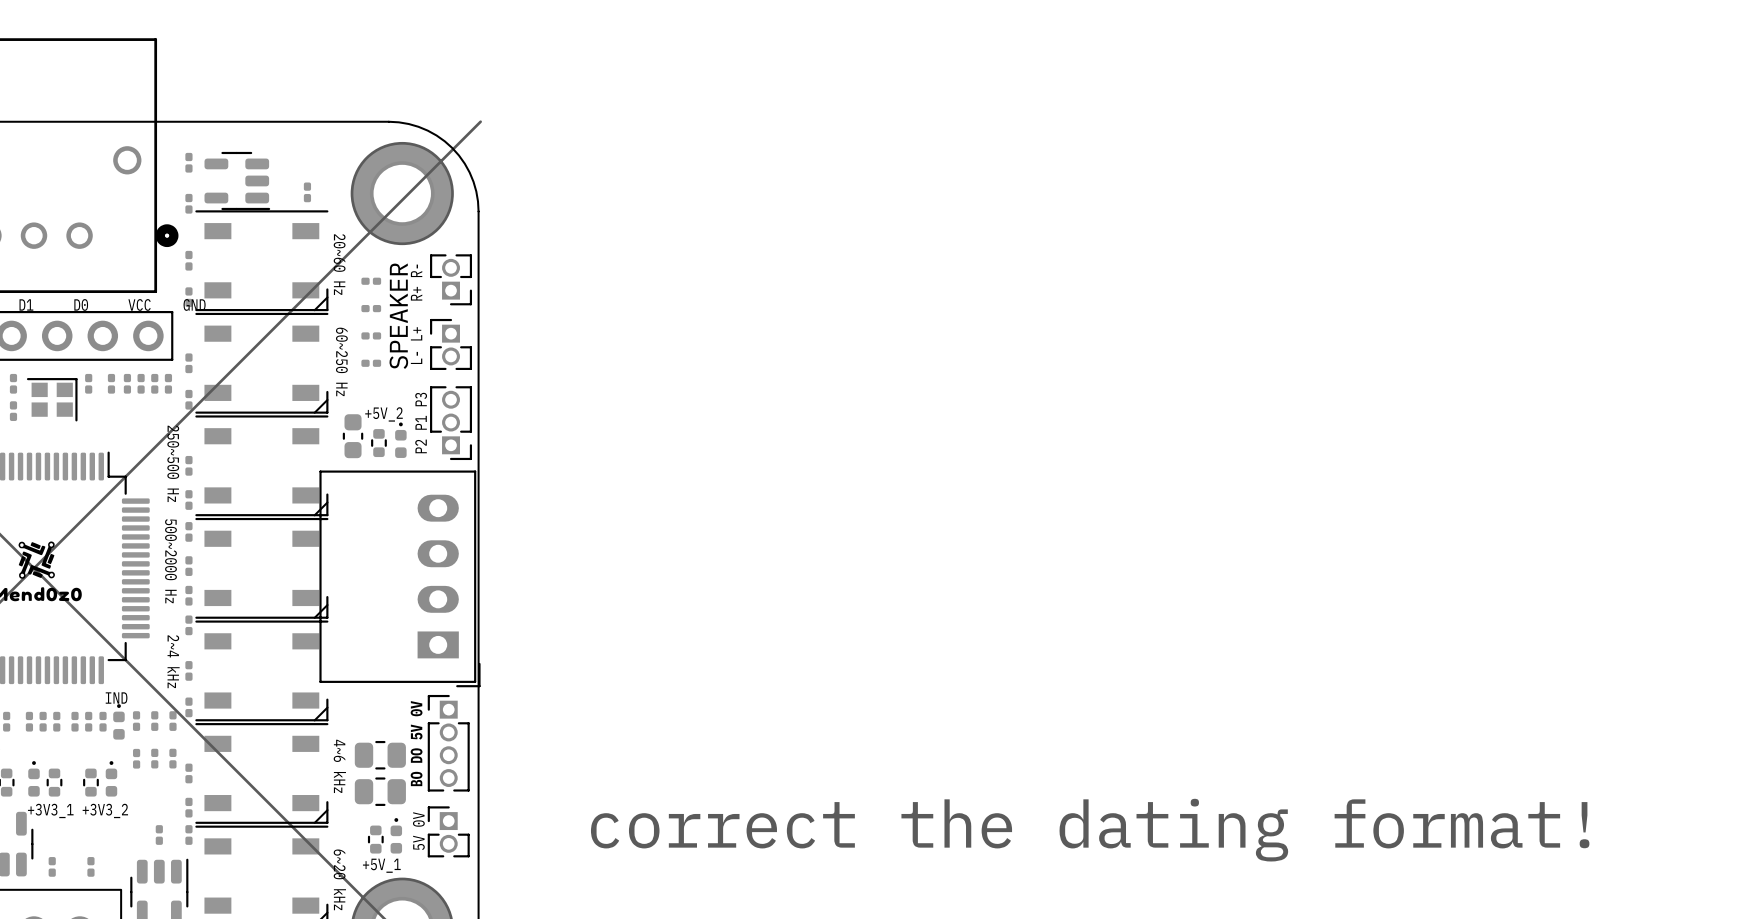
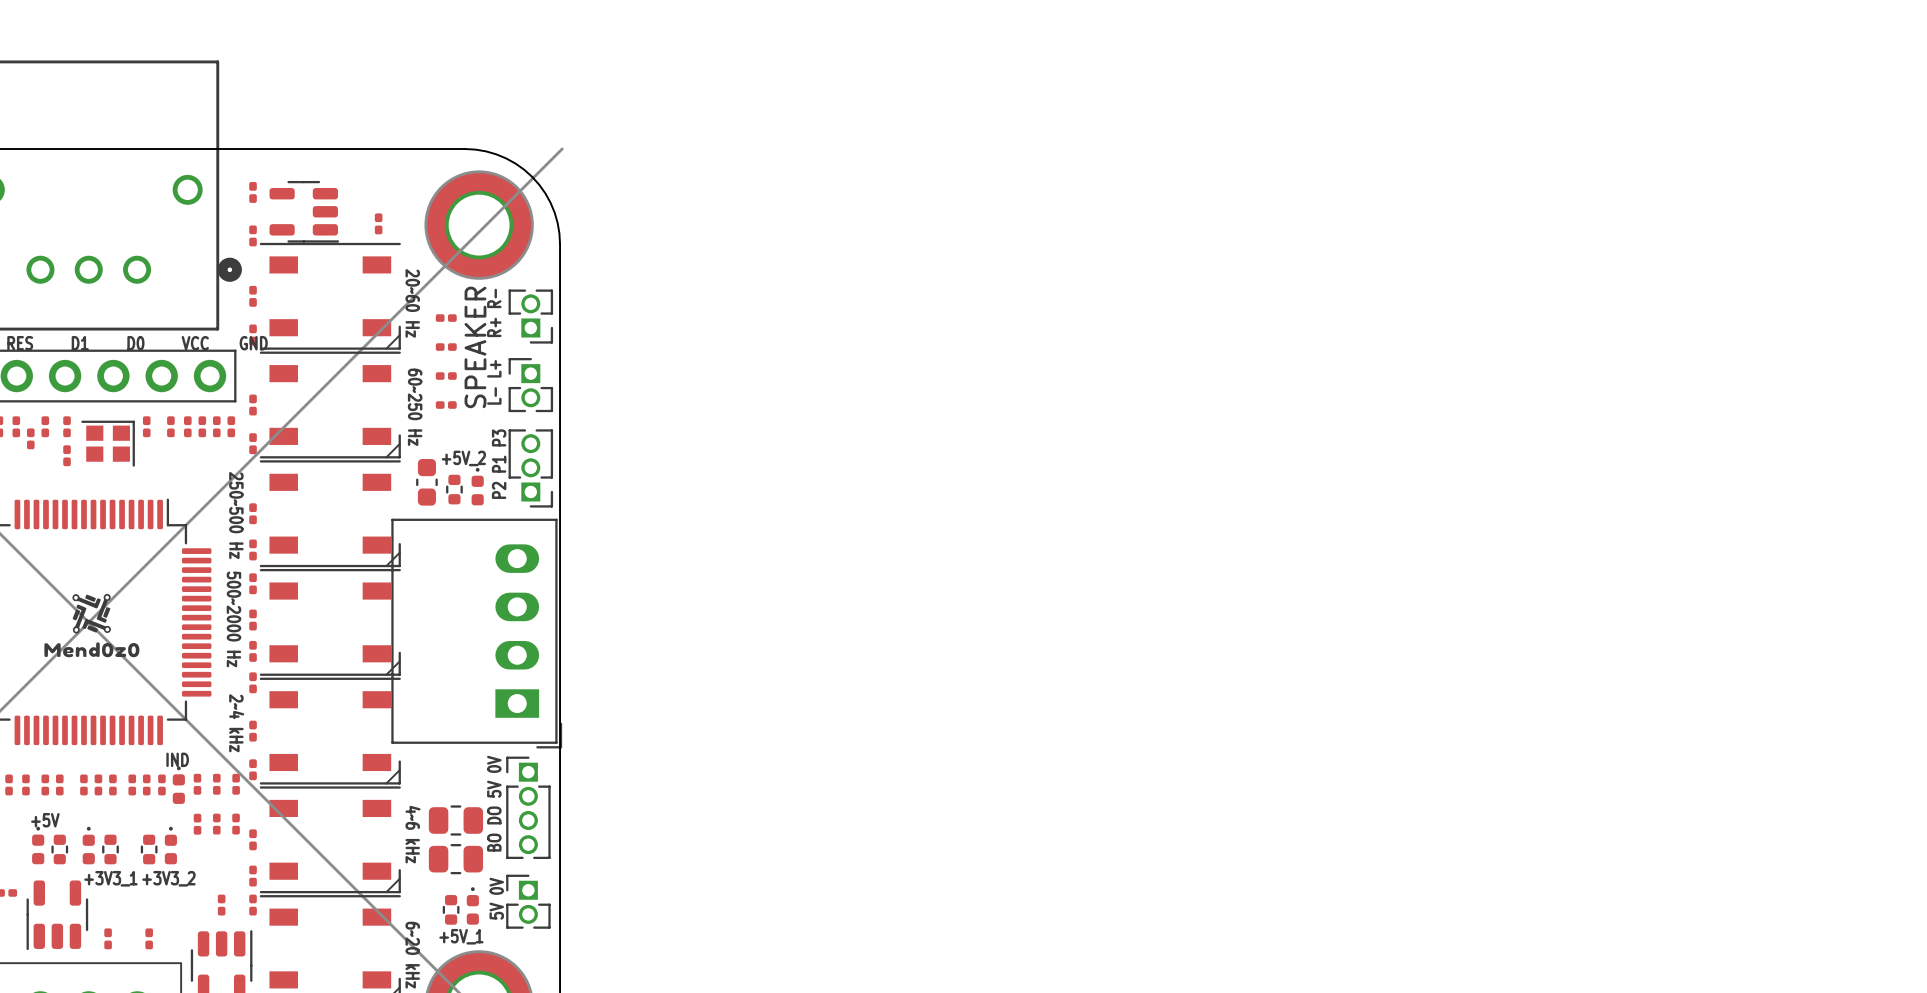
text: correct the dating format! (1090, 830) -> none

